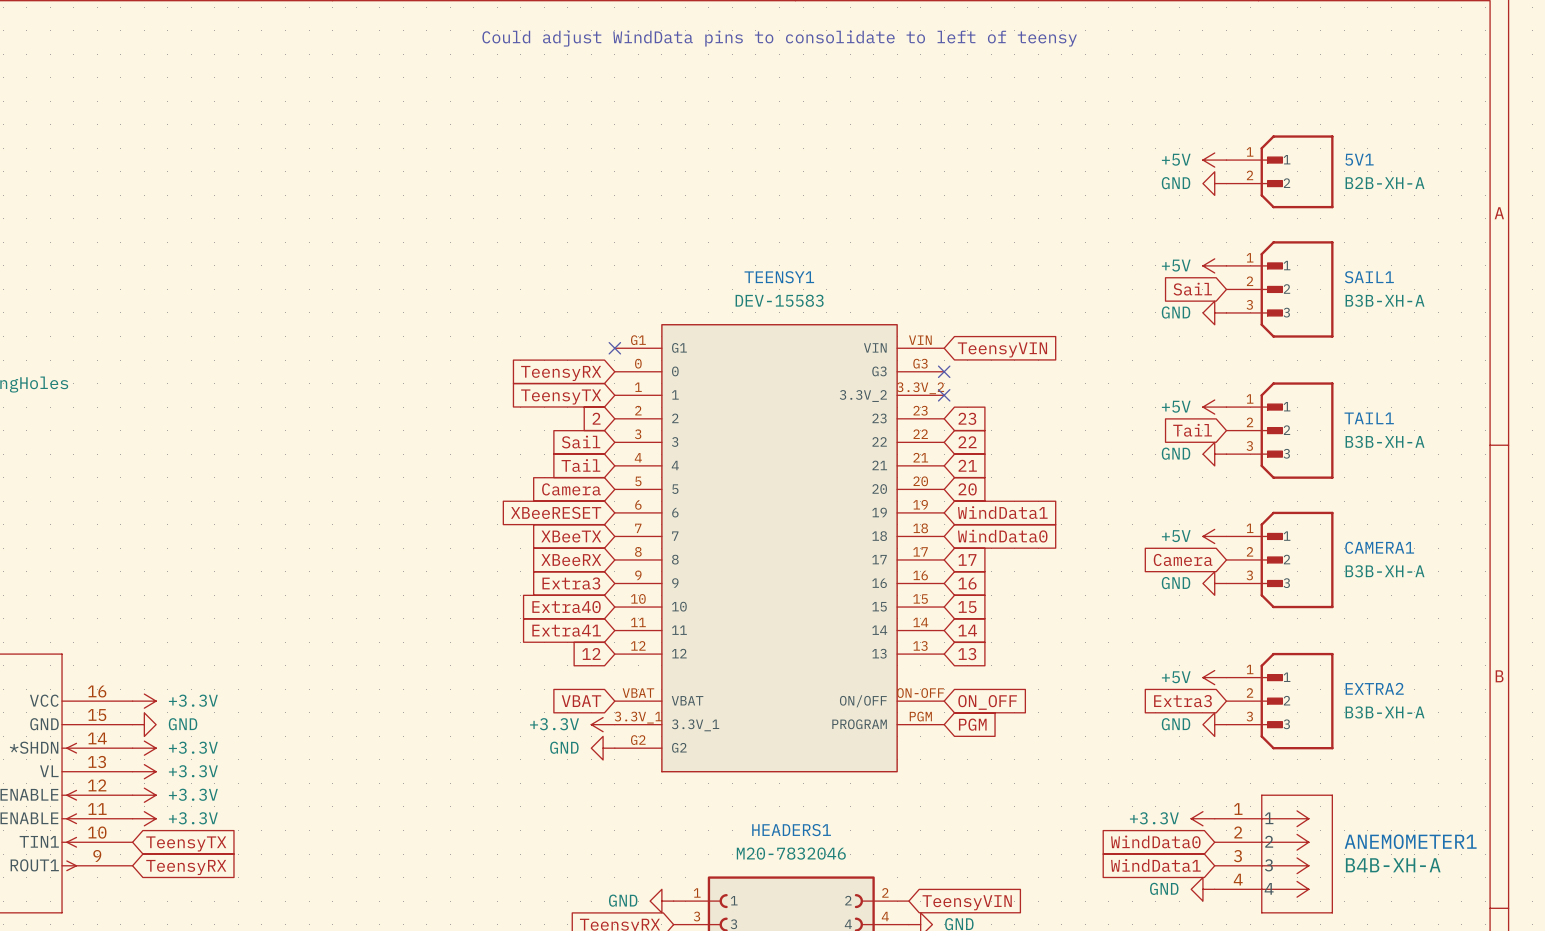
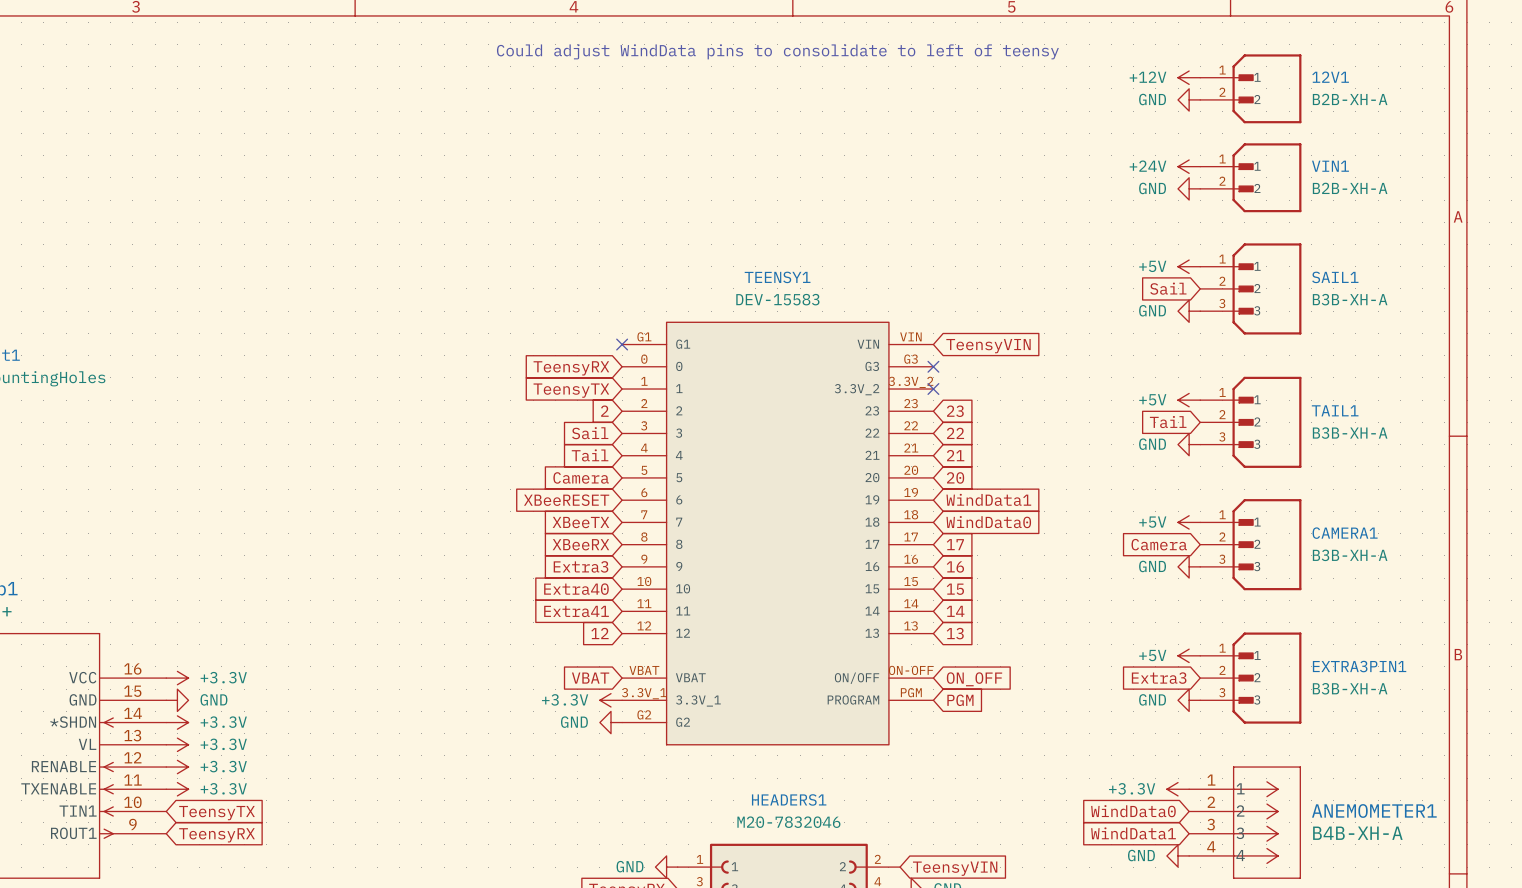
power symbol: none -> +12V (1189, 77)
12V1: none -> B2B-XH-A (1250, 88)
power symbol: none -> GND (1189, 99)
5V1 name: 5V1 (1359, 159) -> VIN1 (1330, 166)
power symbol: +5V (1214, 160) -> +24V (1189, 166)
EXTRA2 name: EXTRA2 (1374, 688) -> EXTRA3PIN1 (1359, 666)

